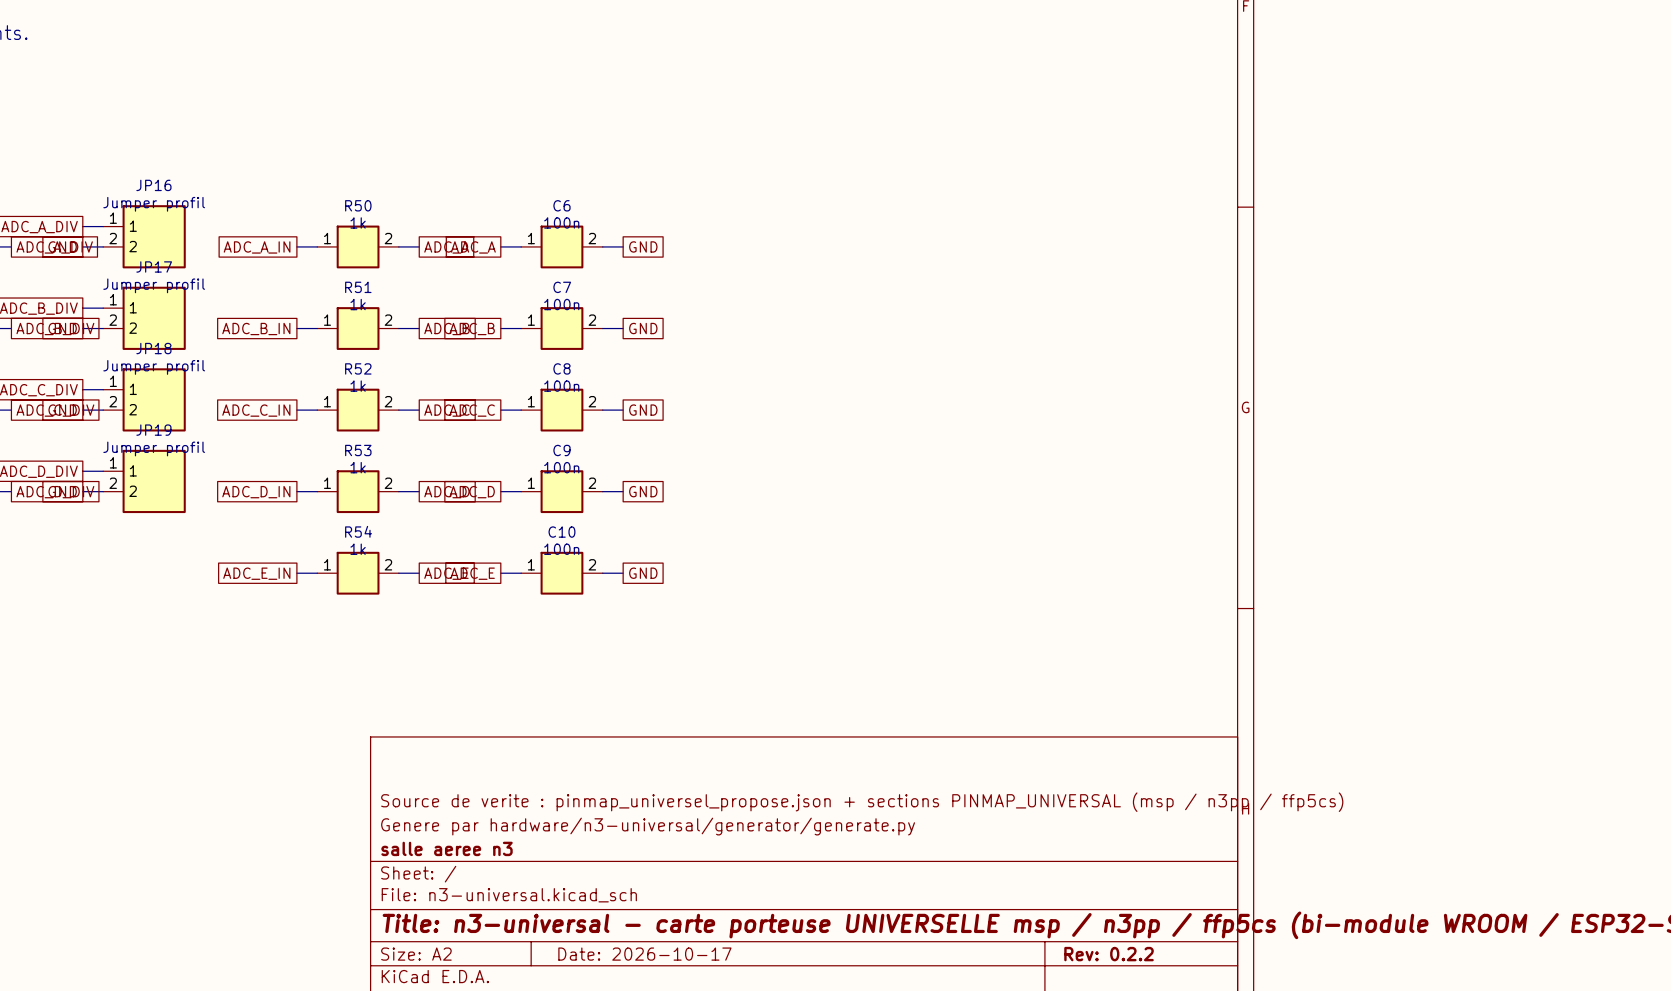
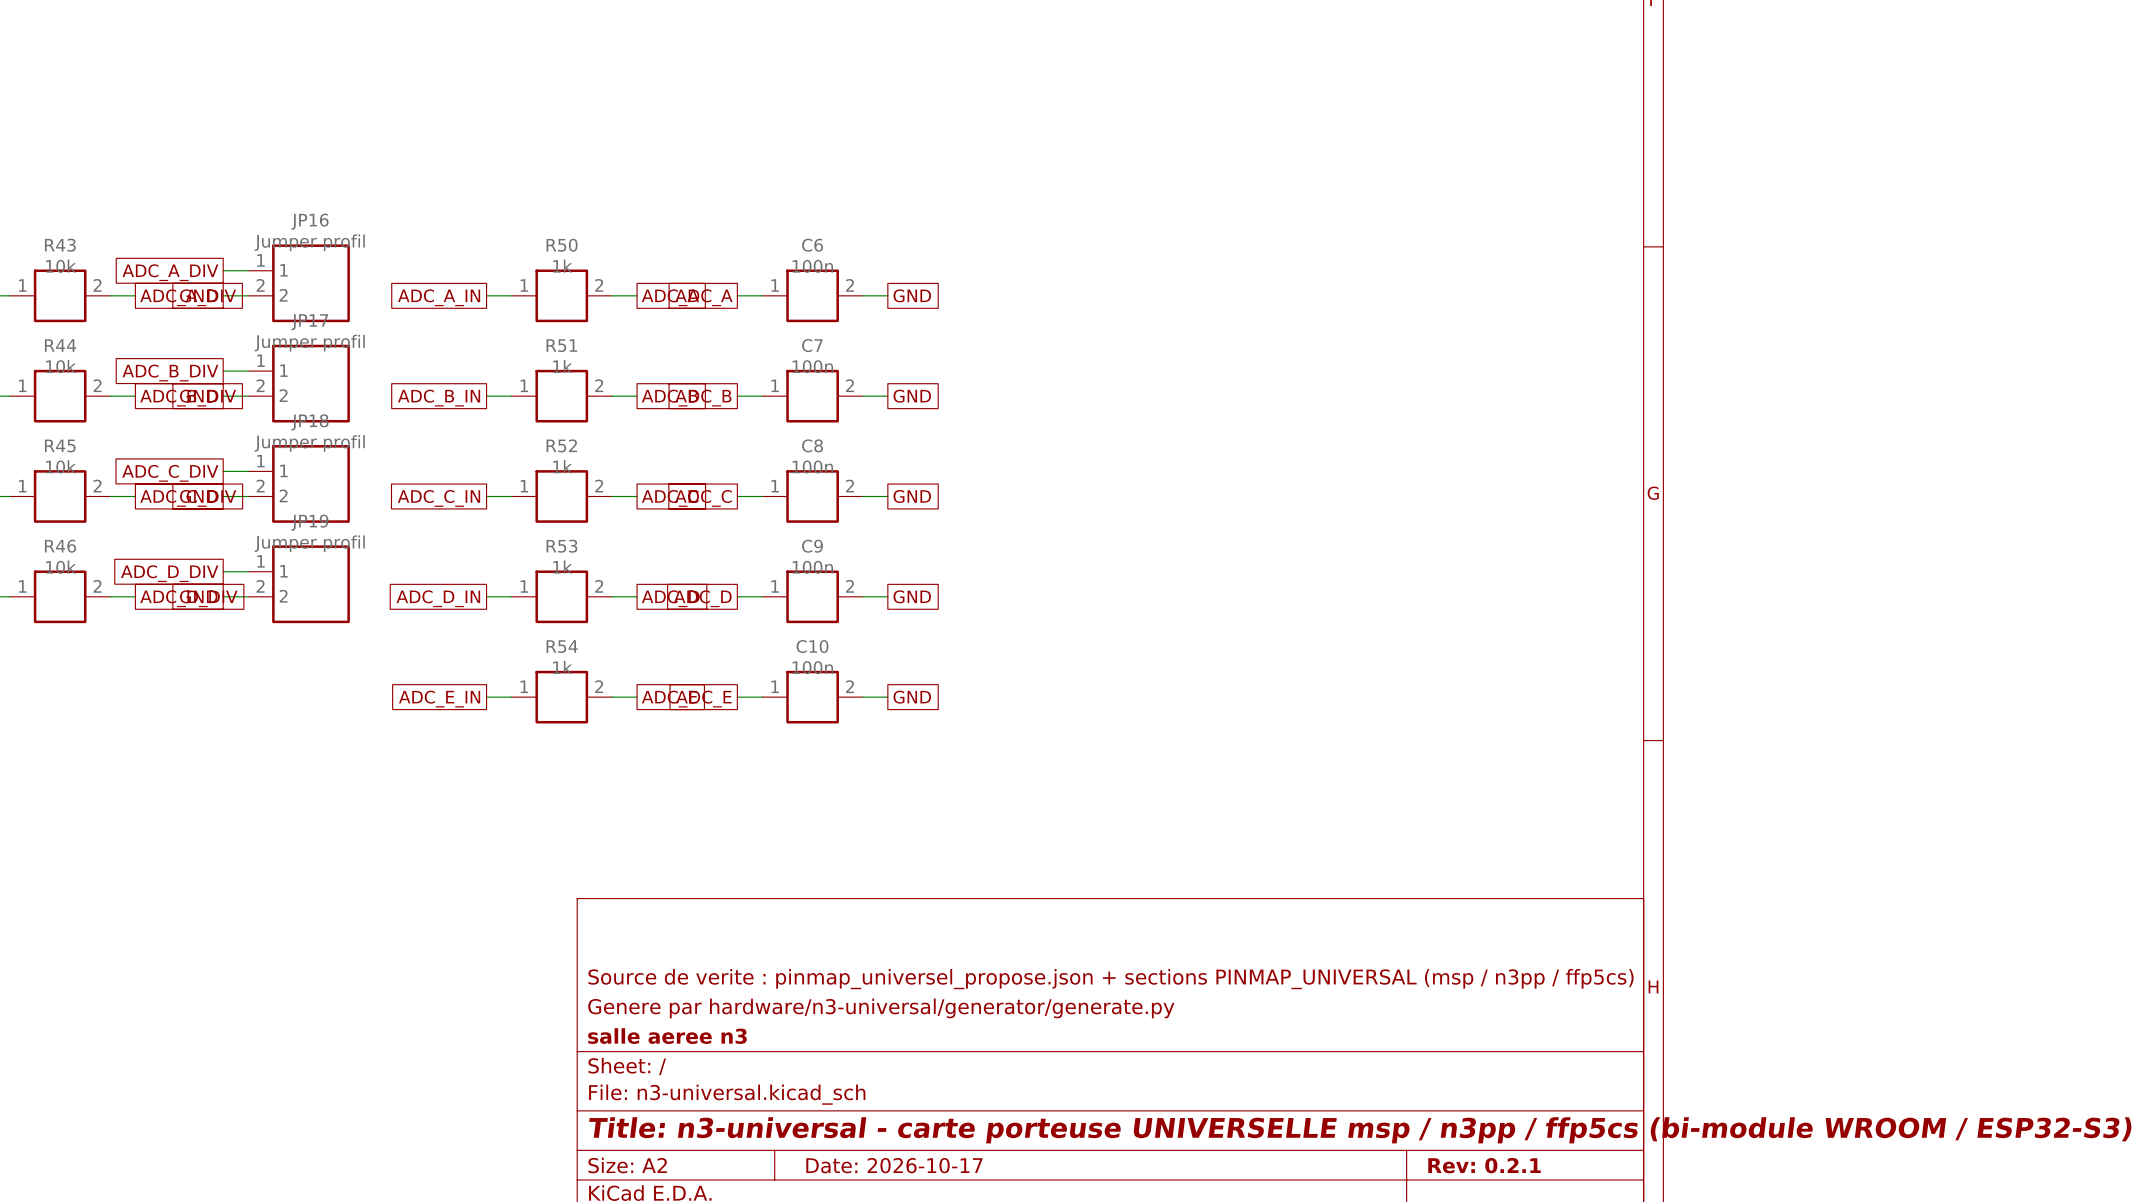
title block: Rev: 0.2.2 (1109, 954) -> Rev: 0.2.1 (1484, 1165)

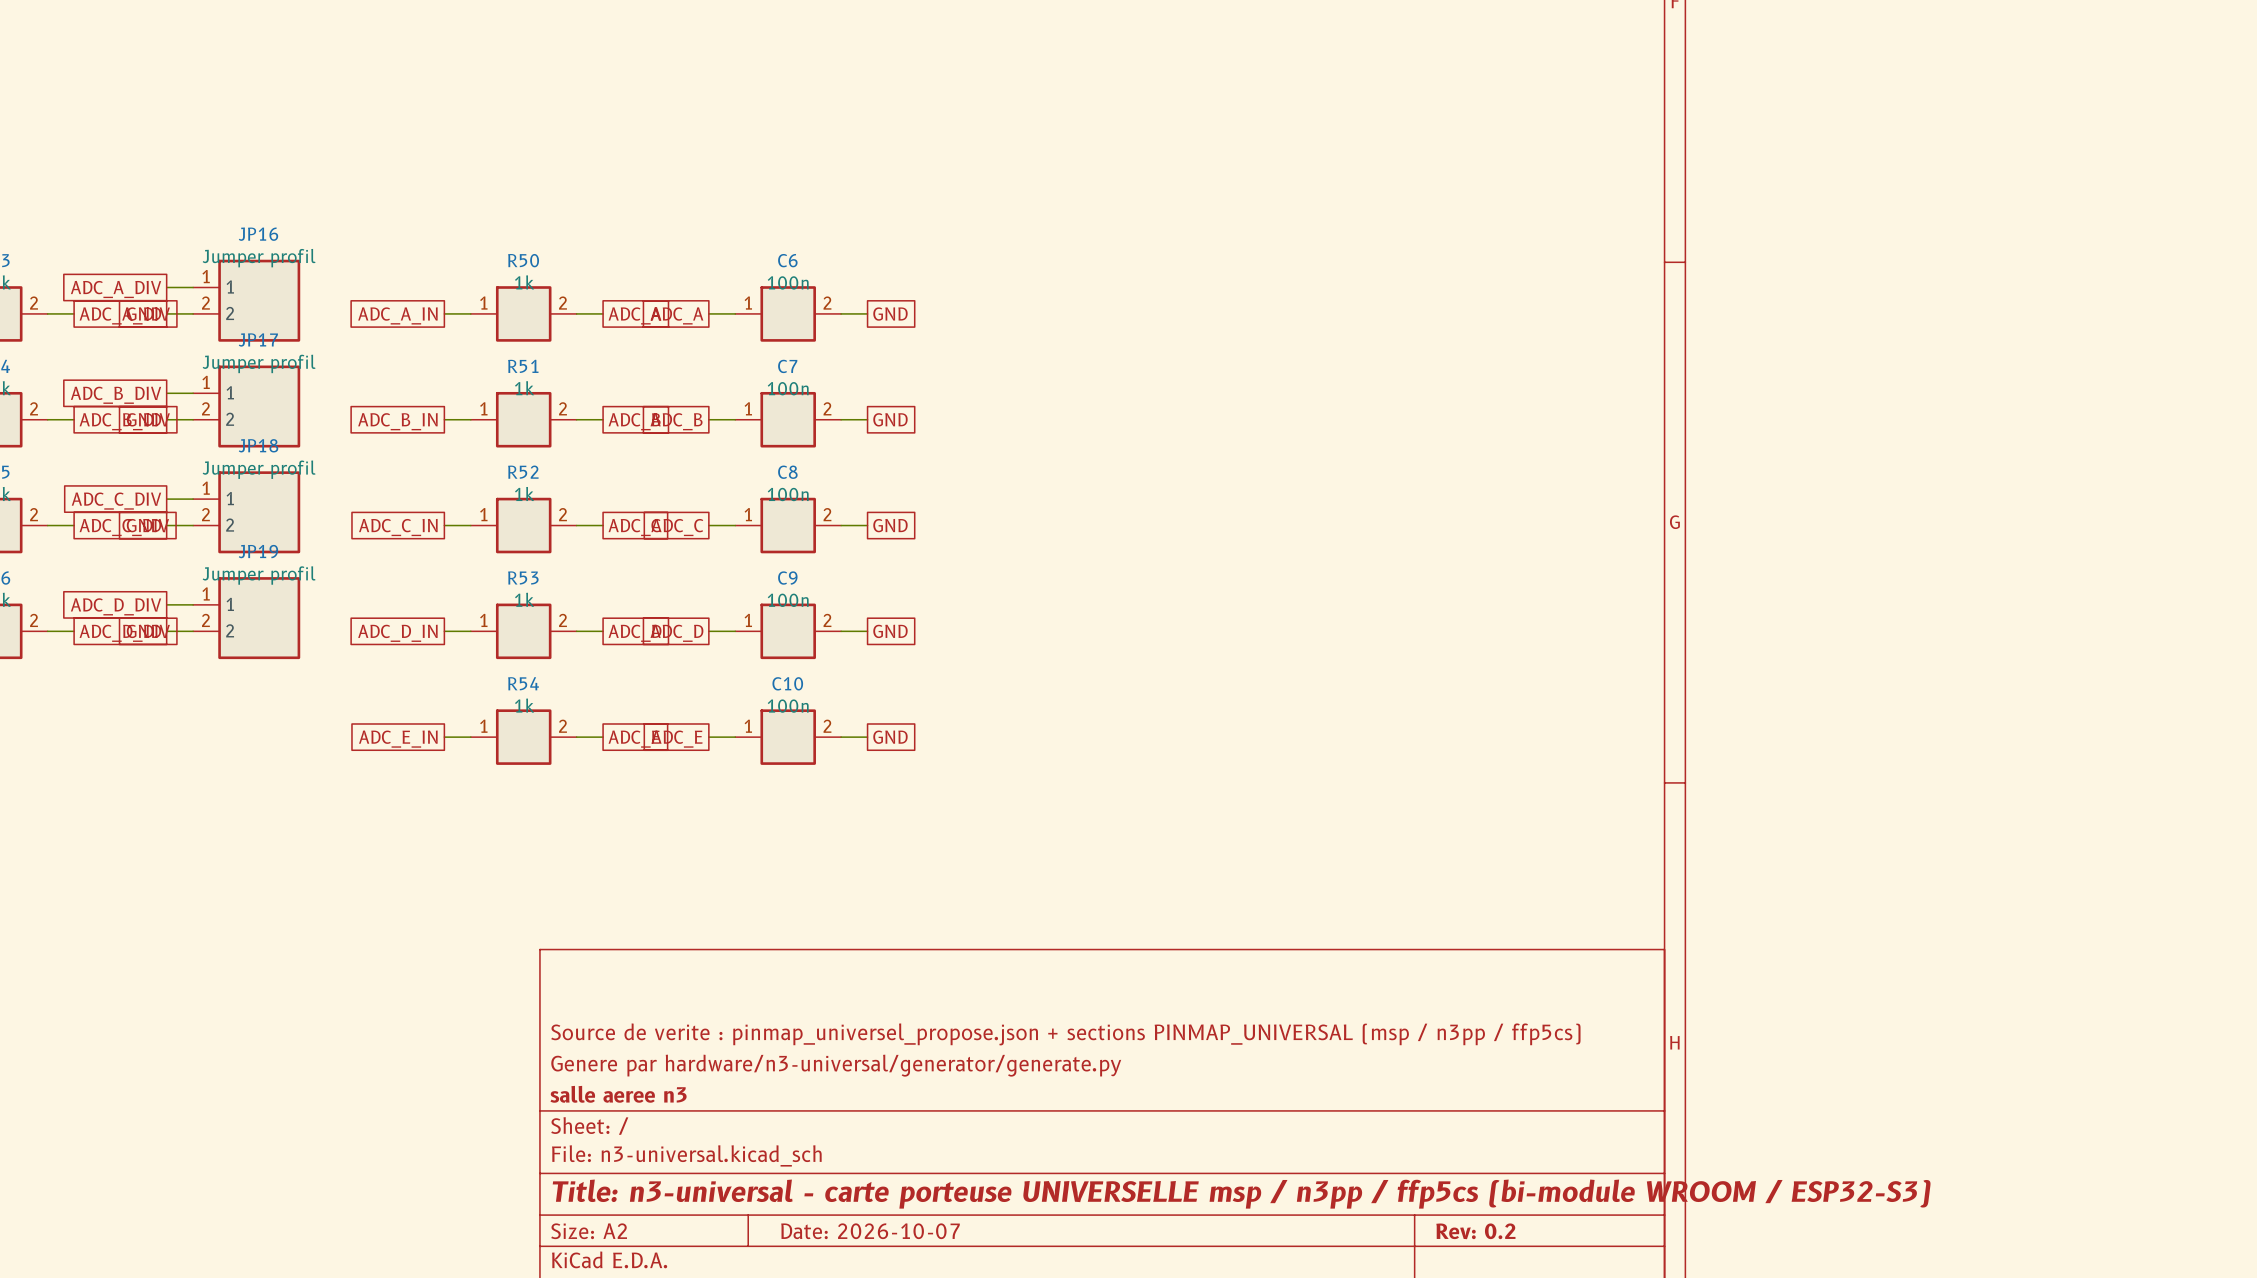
title block: Date: 2026-10-17 (894, 1165) -> Date: 2026-10-07 (870, 1231)
title block: Rev: 0.2.1 (1484, 1165) -> Rev: 0.2 (1475, 1231)

